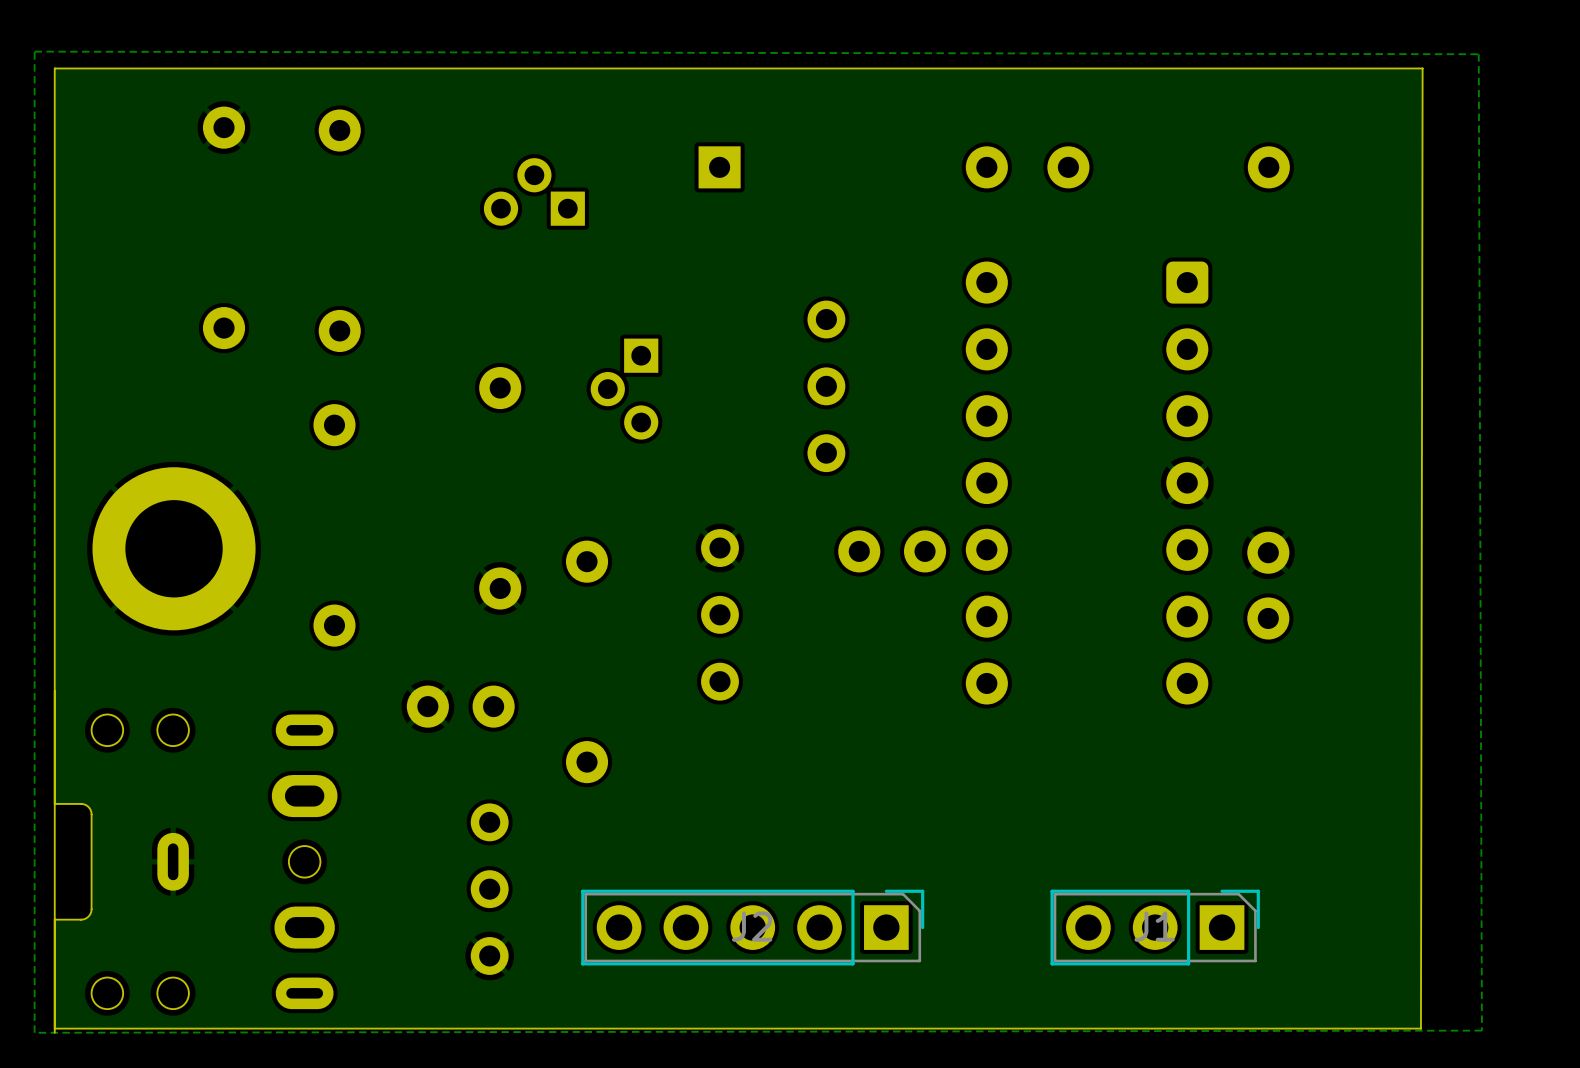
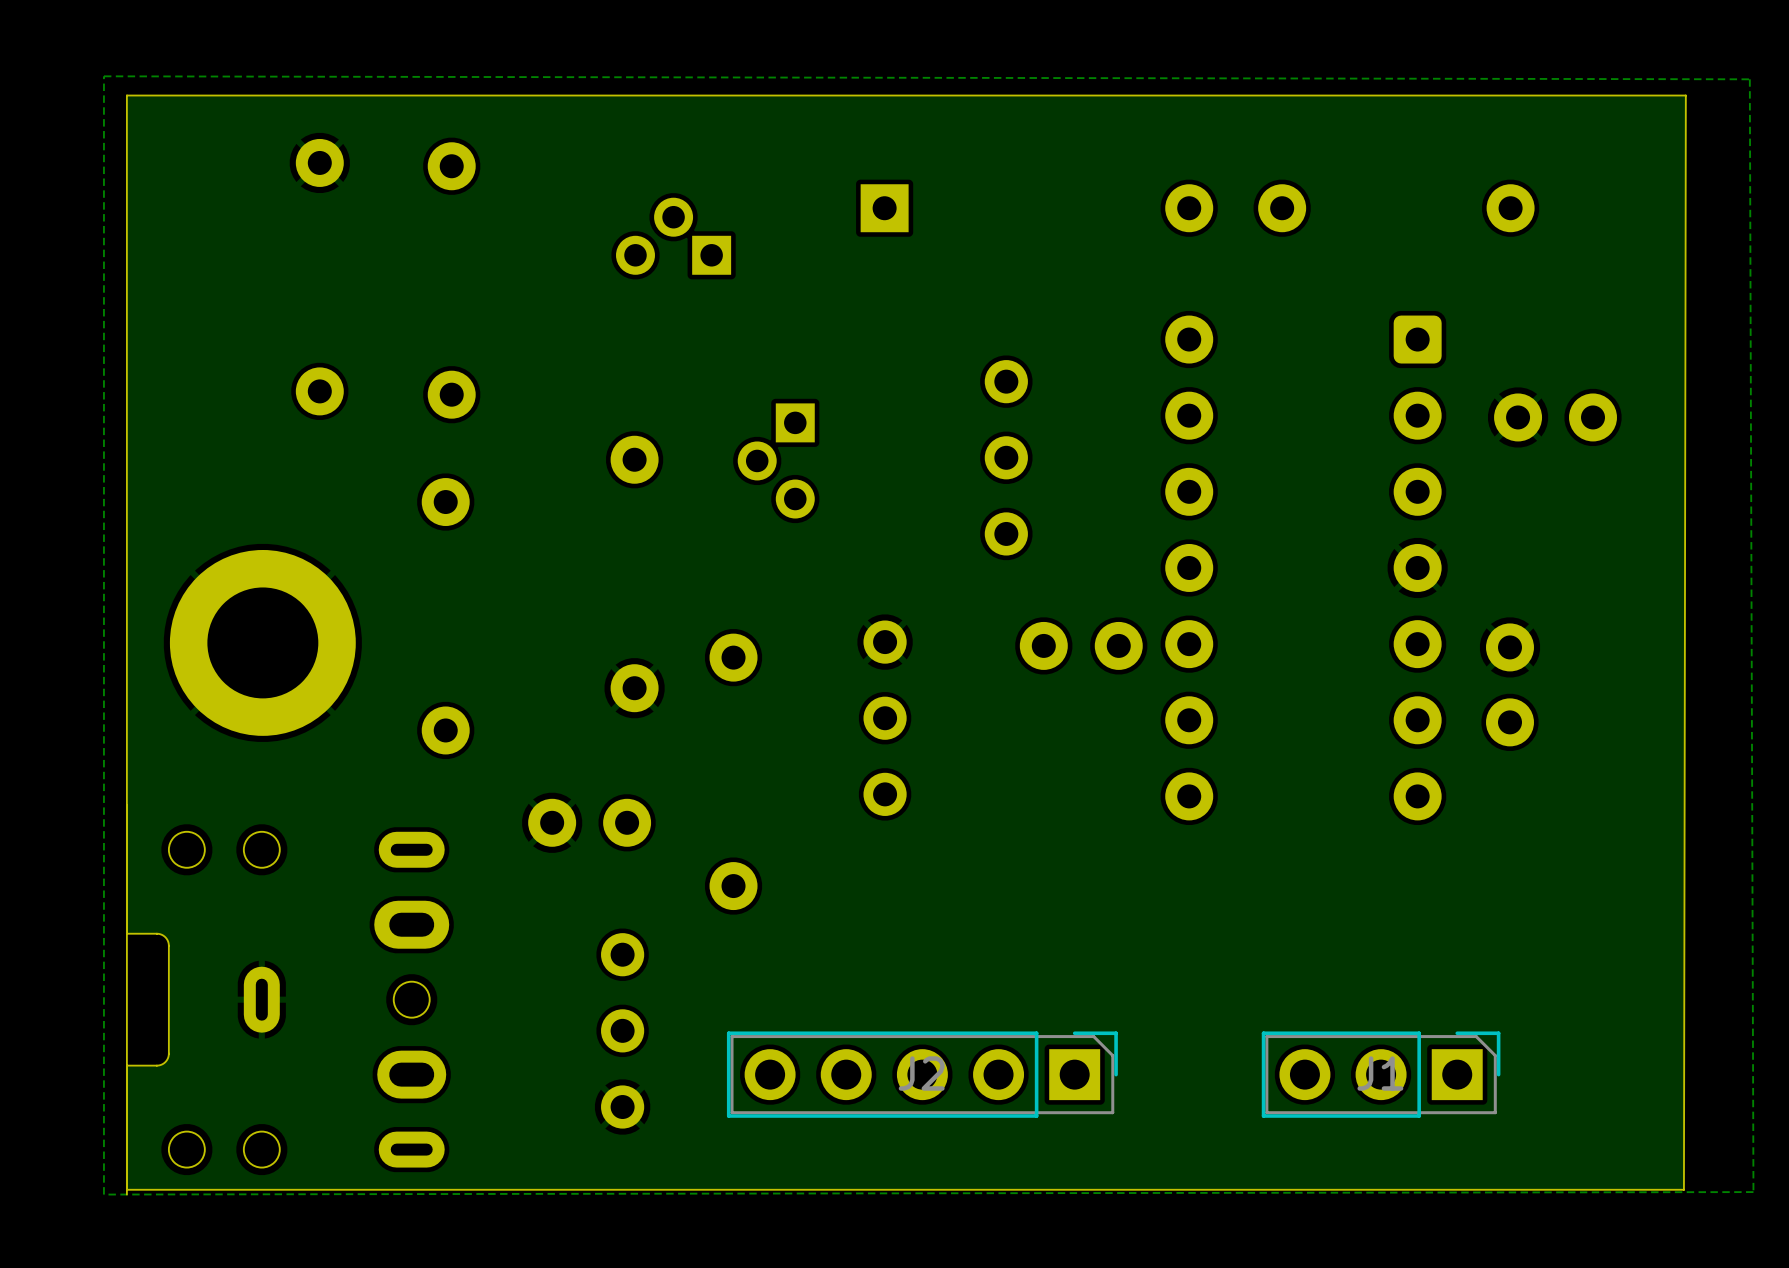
part: none -> (1555, 417)

